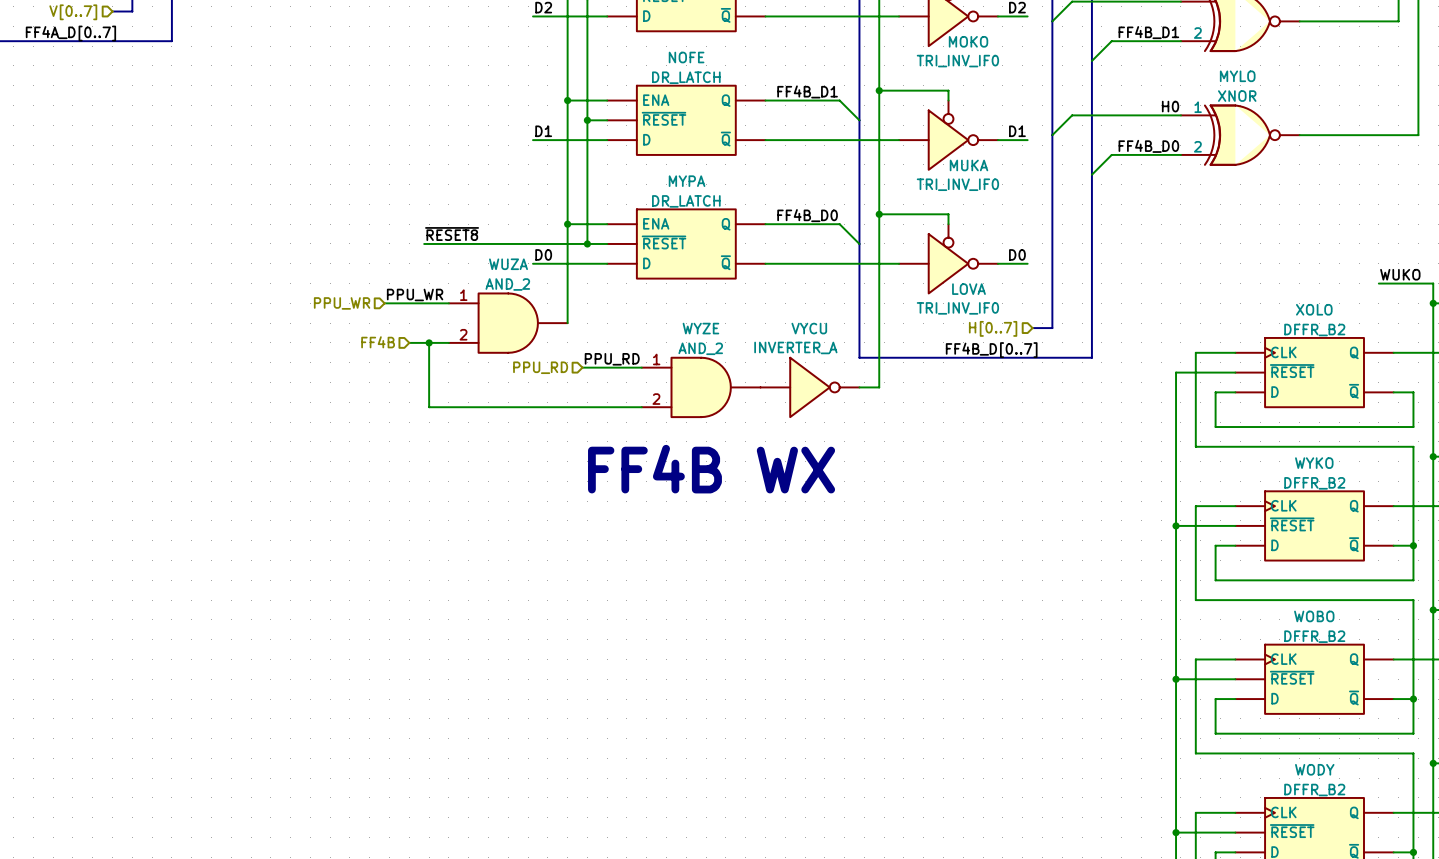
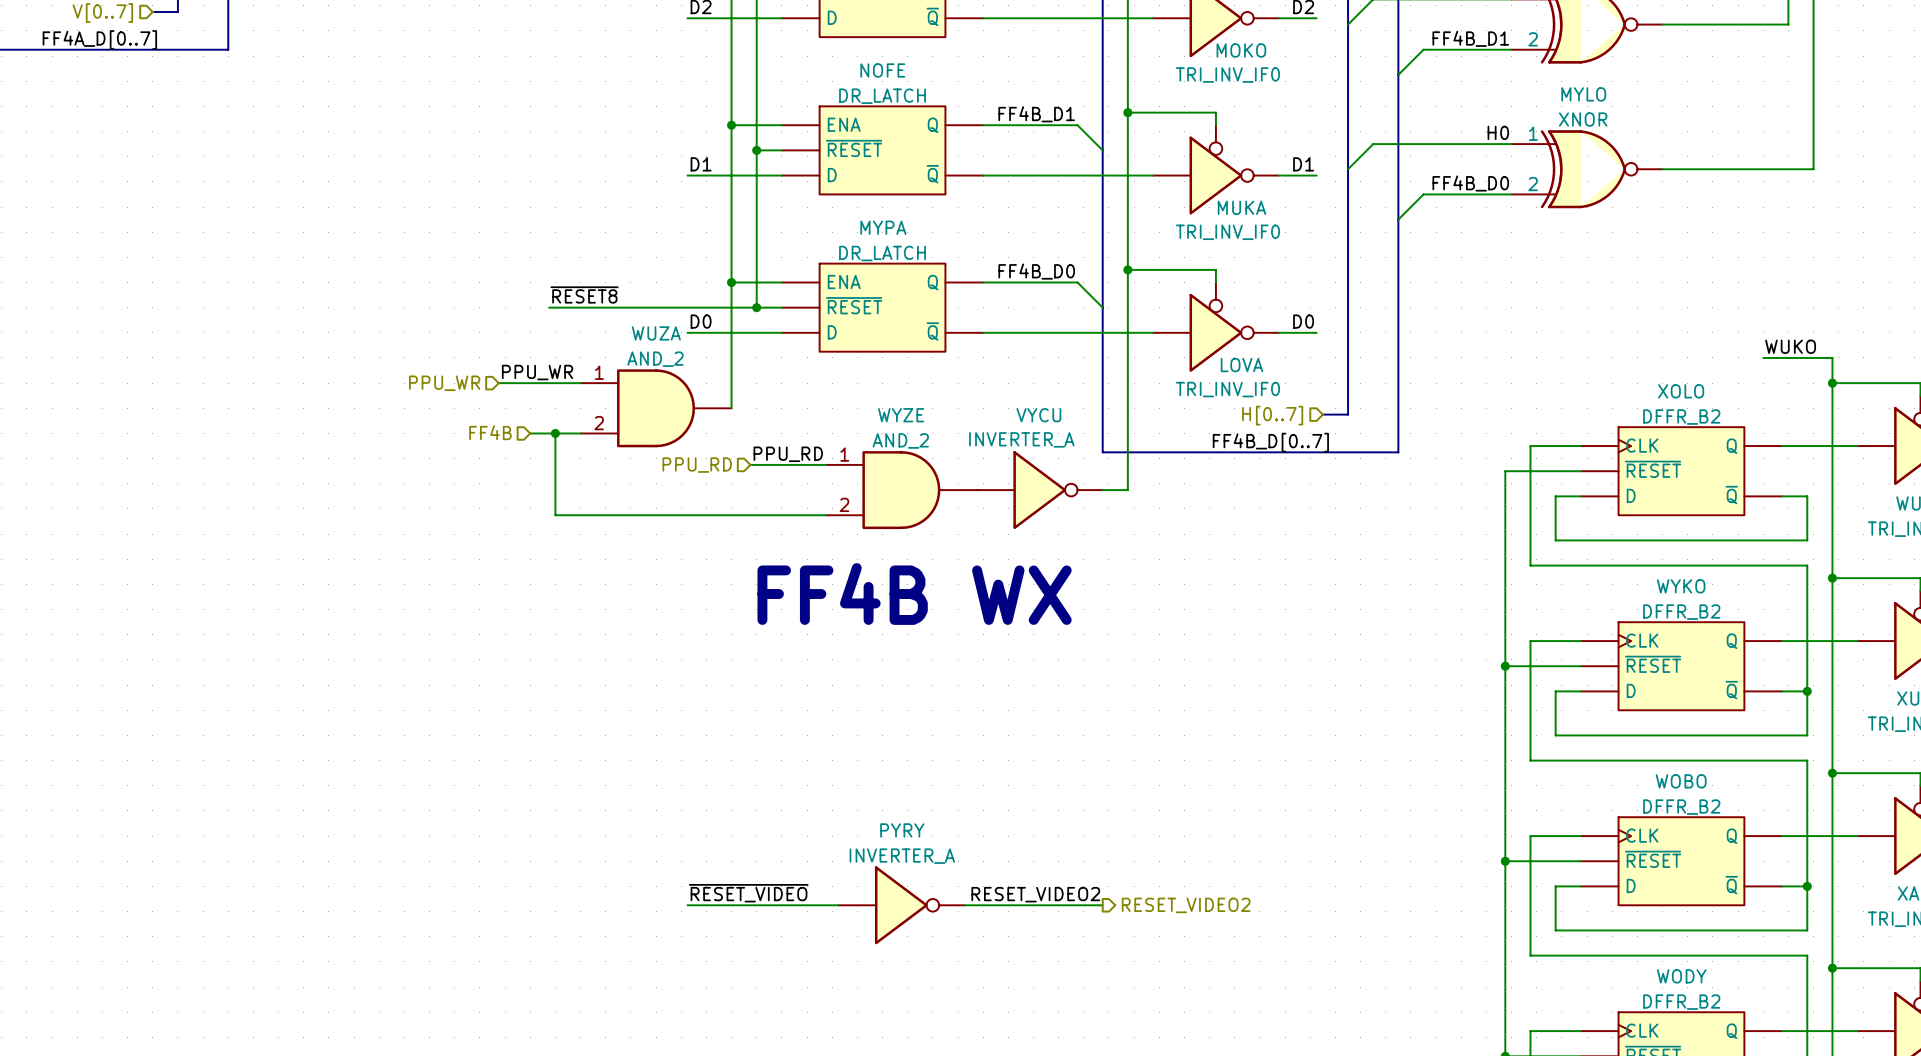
label: none -> ~{RESET_VIDEO} (748, 893)
label: none -> RESET_VIDEO2 (1035, 894)
wire: none -> (687, 905) (838, 905)
PYRY: none -> INVERTER_A (901, 905)
wire: none -> (964, 905) (1102, 905)
hierarchical label: none -> RESET_VIDEO2 (1186, 905)

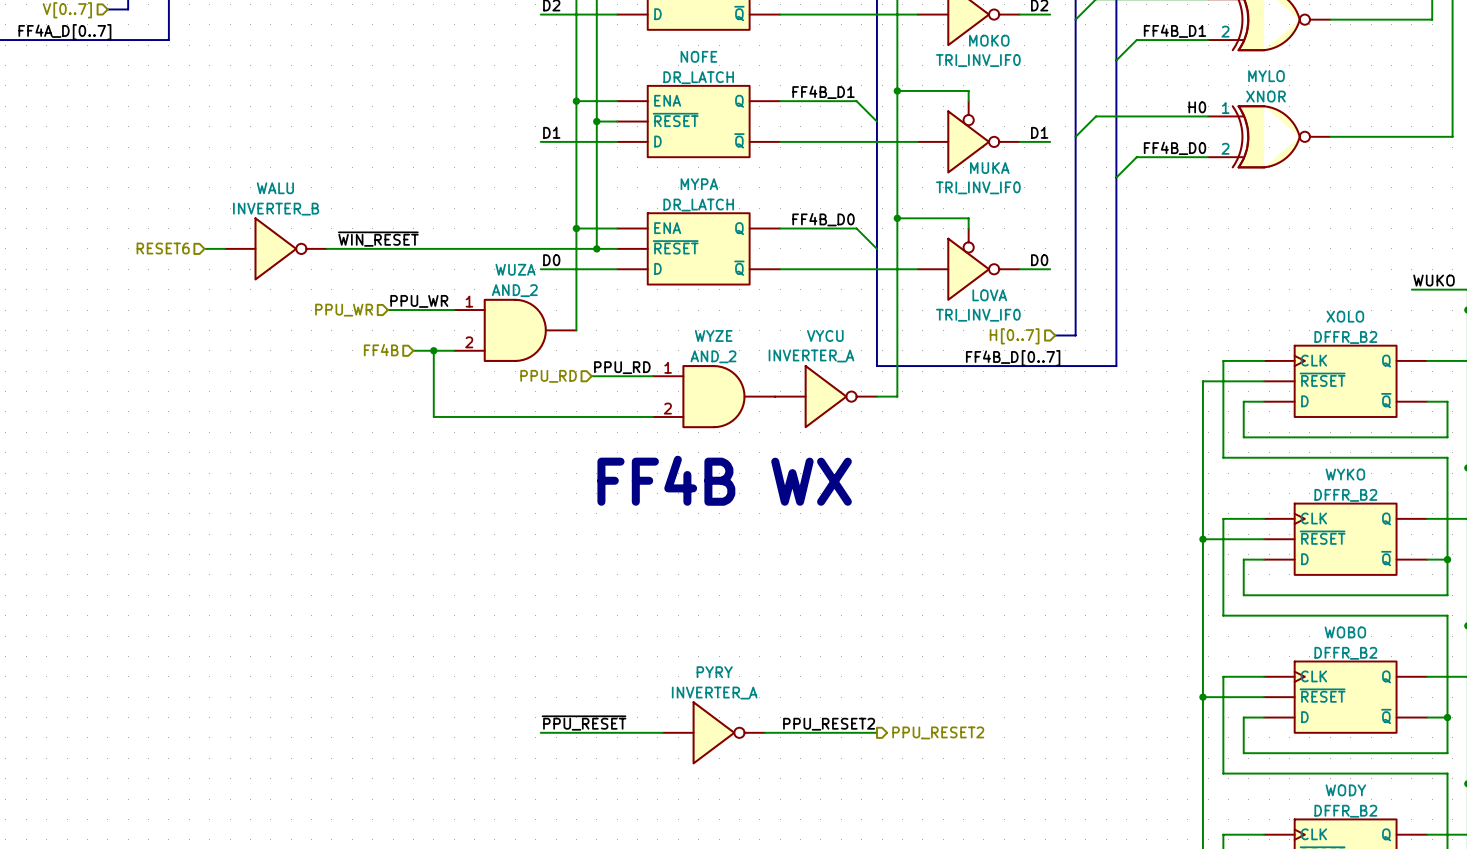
label: ~{RESET8} (584, 294) -> ~{WIN_RESET} (378, 239)
hierarchical label: none -> RESET6 (163, 248)
wire: none -> (204, 248) (224, 248)
WALU: none -> INVERTER_B (275, 248)
wire: none -> (326, 248) (428, 248)
label: ~{RESET_VIDEO} (748, 893) -> ~{PPU_RESET} (584, 723)
label: RESET_VIDEO2 (1035, 894) -> PPU_RESET2 (829, 724)
hierarchical label: RESET_VIDEO2 (1186, 905) -> PPU_RESET2 (938, 732)

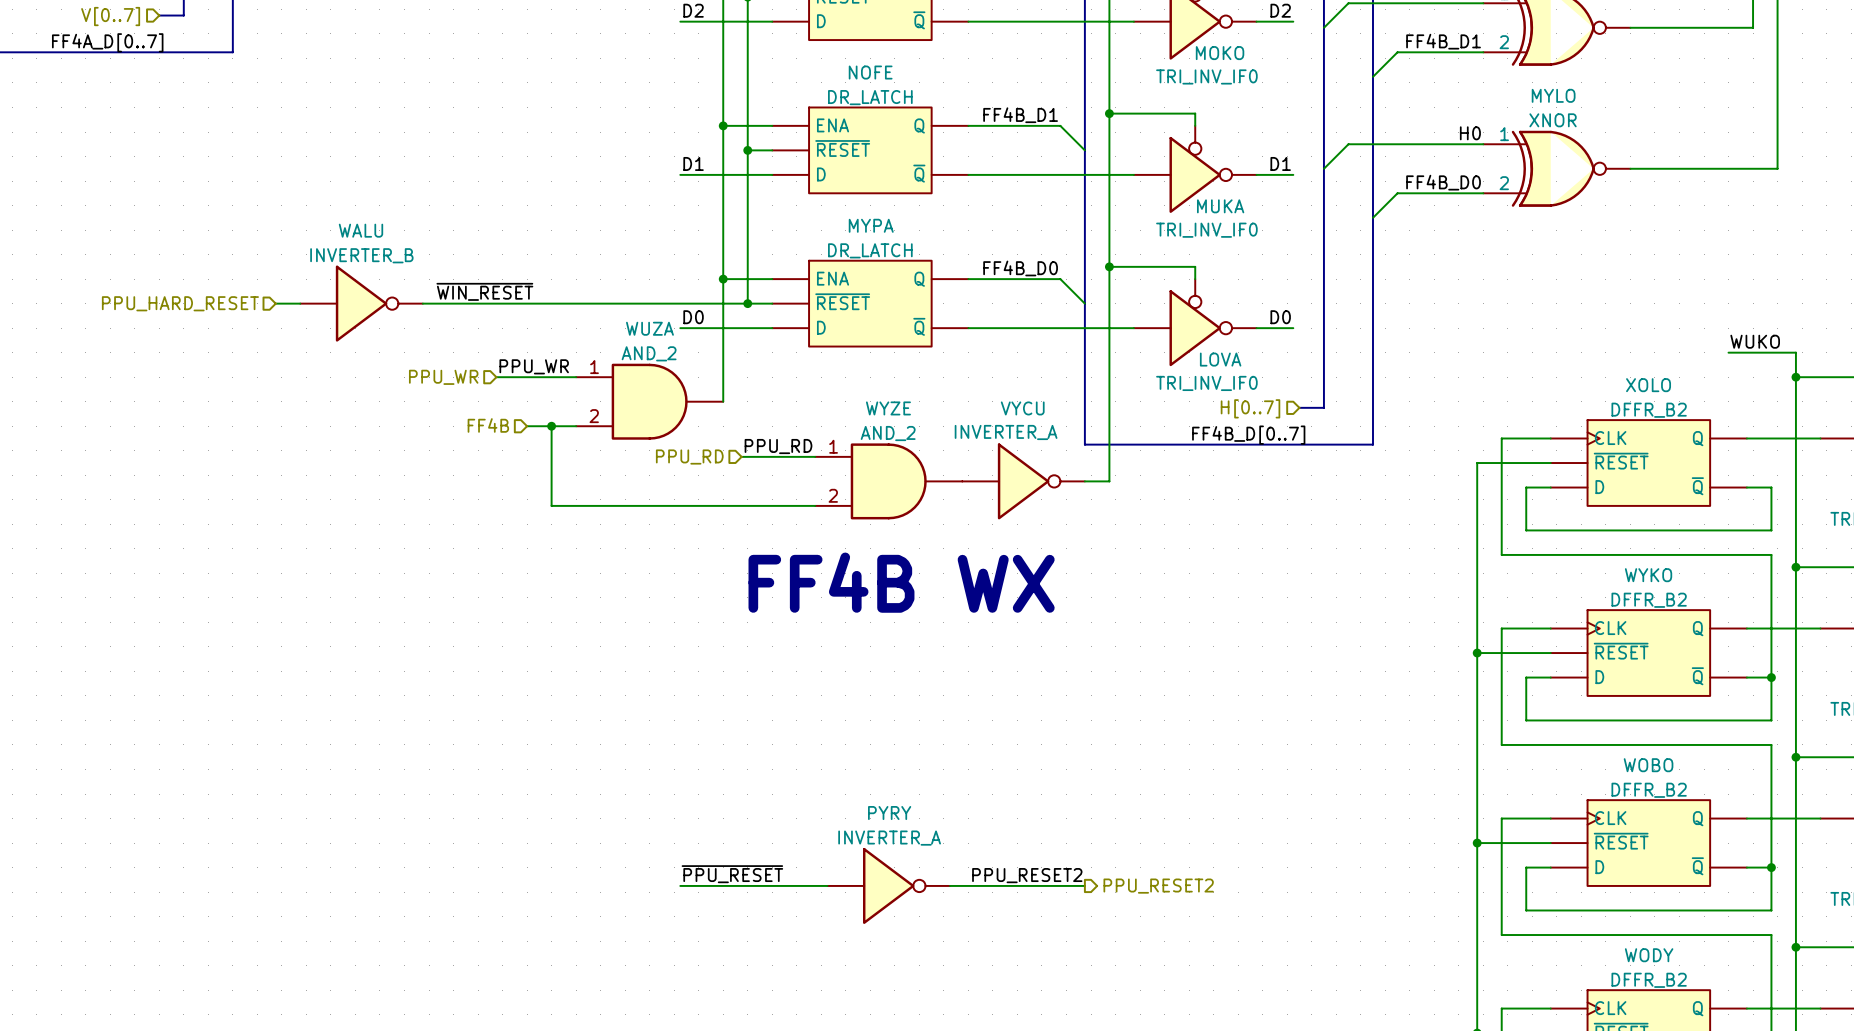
hierarchical label: RESET6 (163, 248) -> PPU_HARD_RESET (180, 303)

